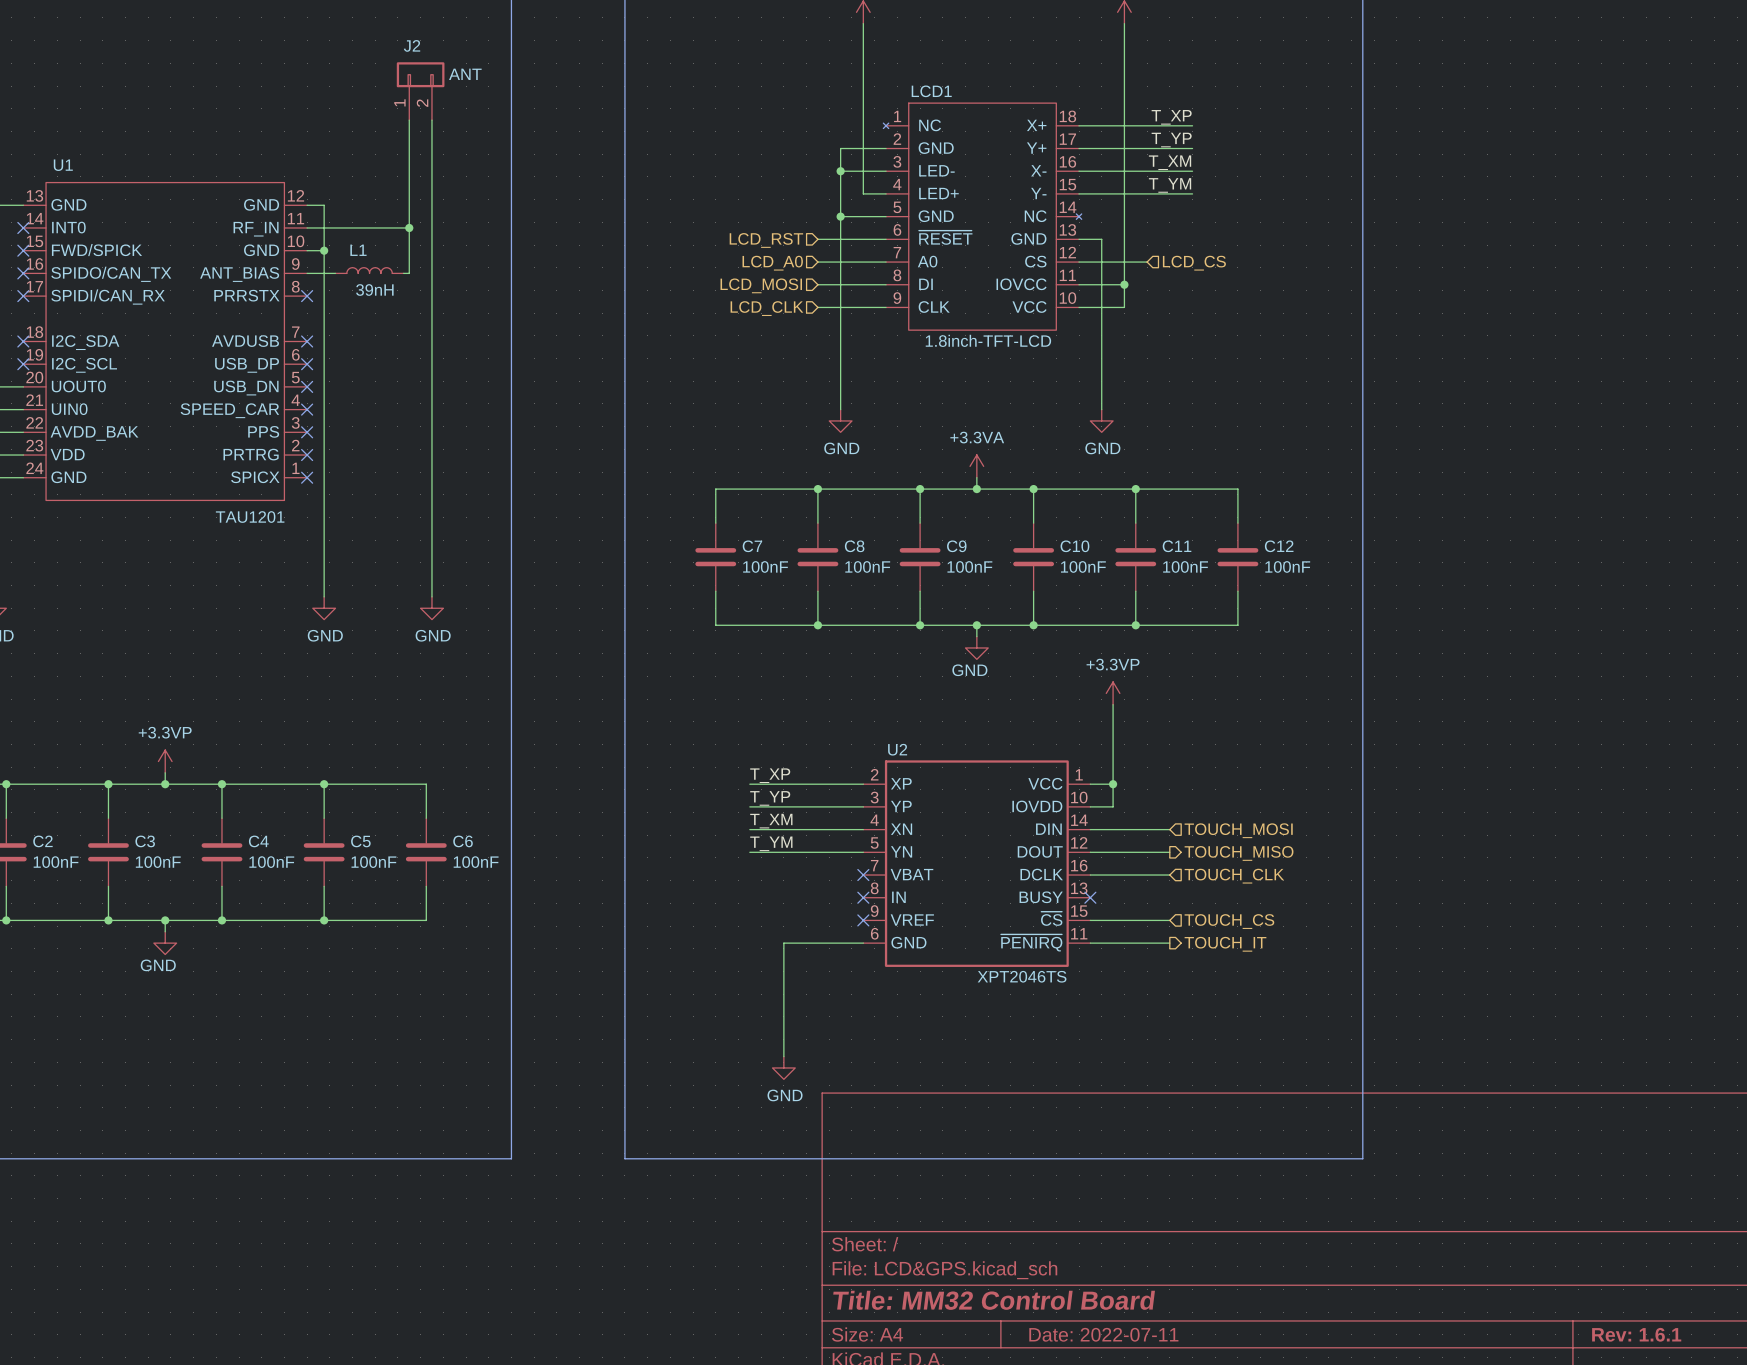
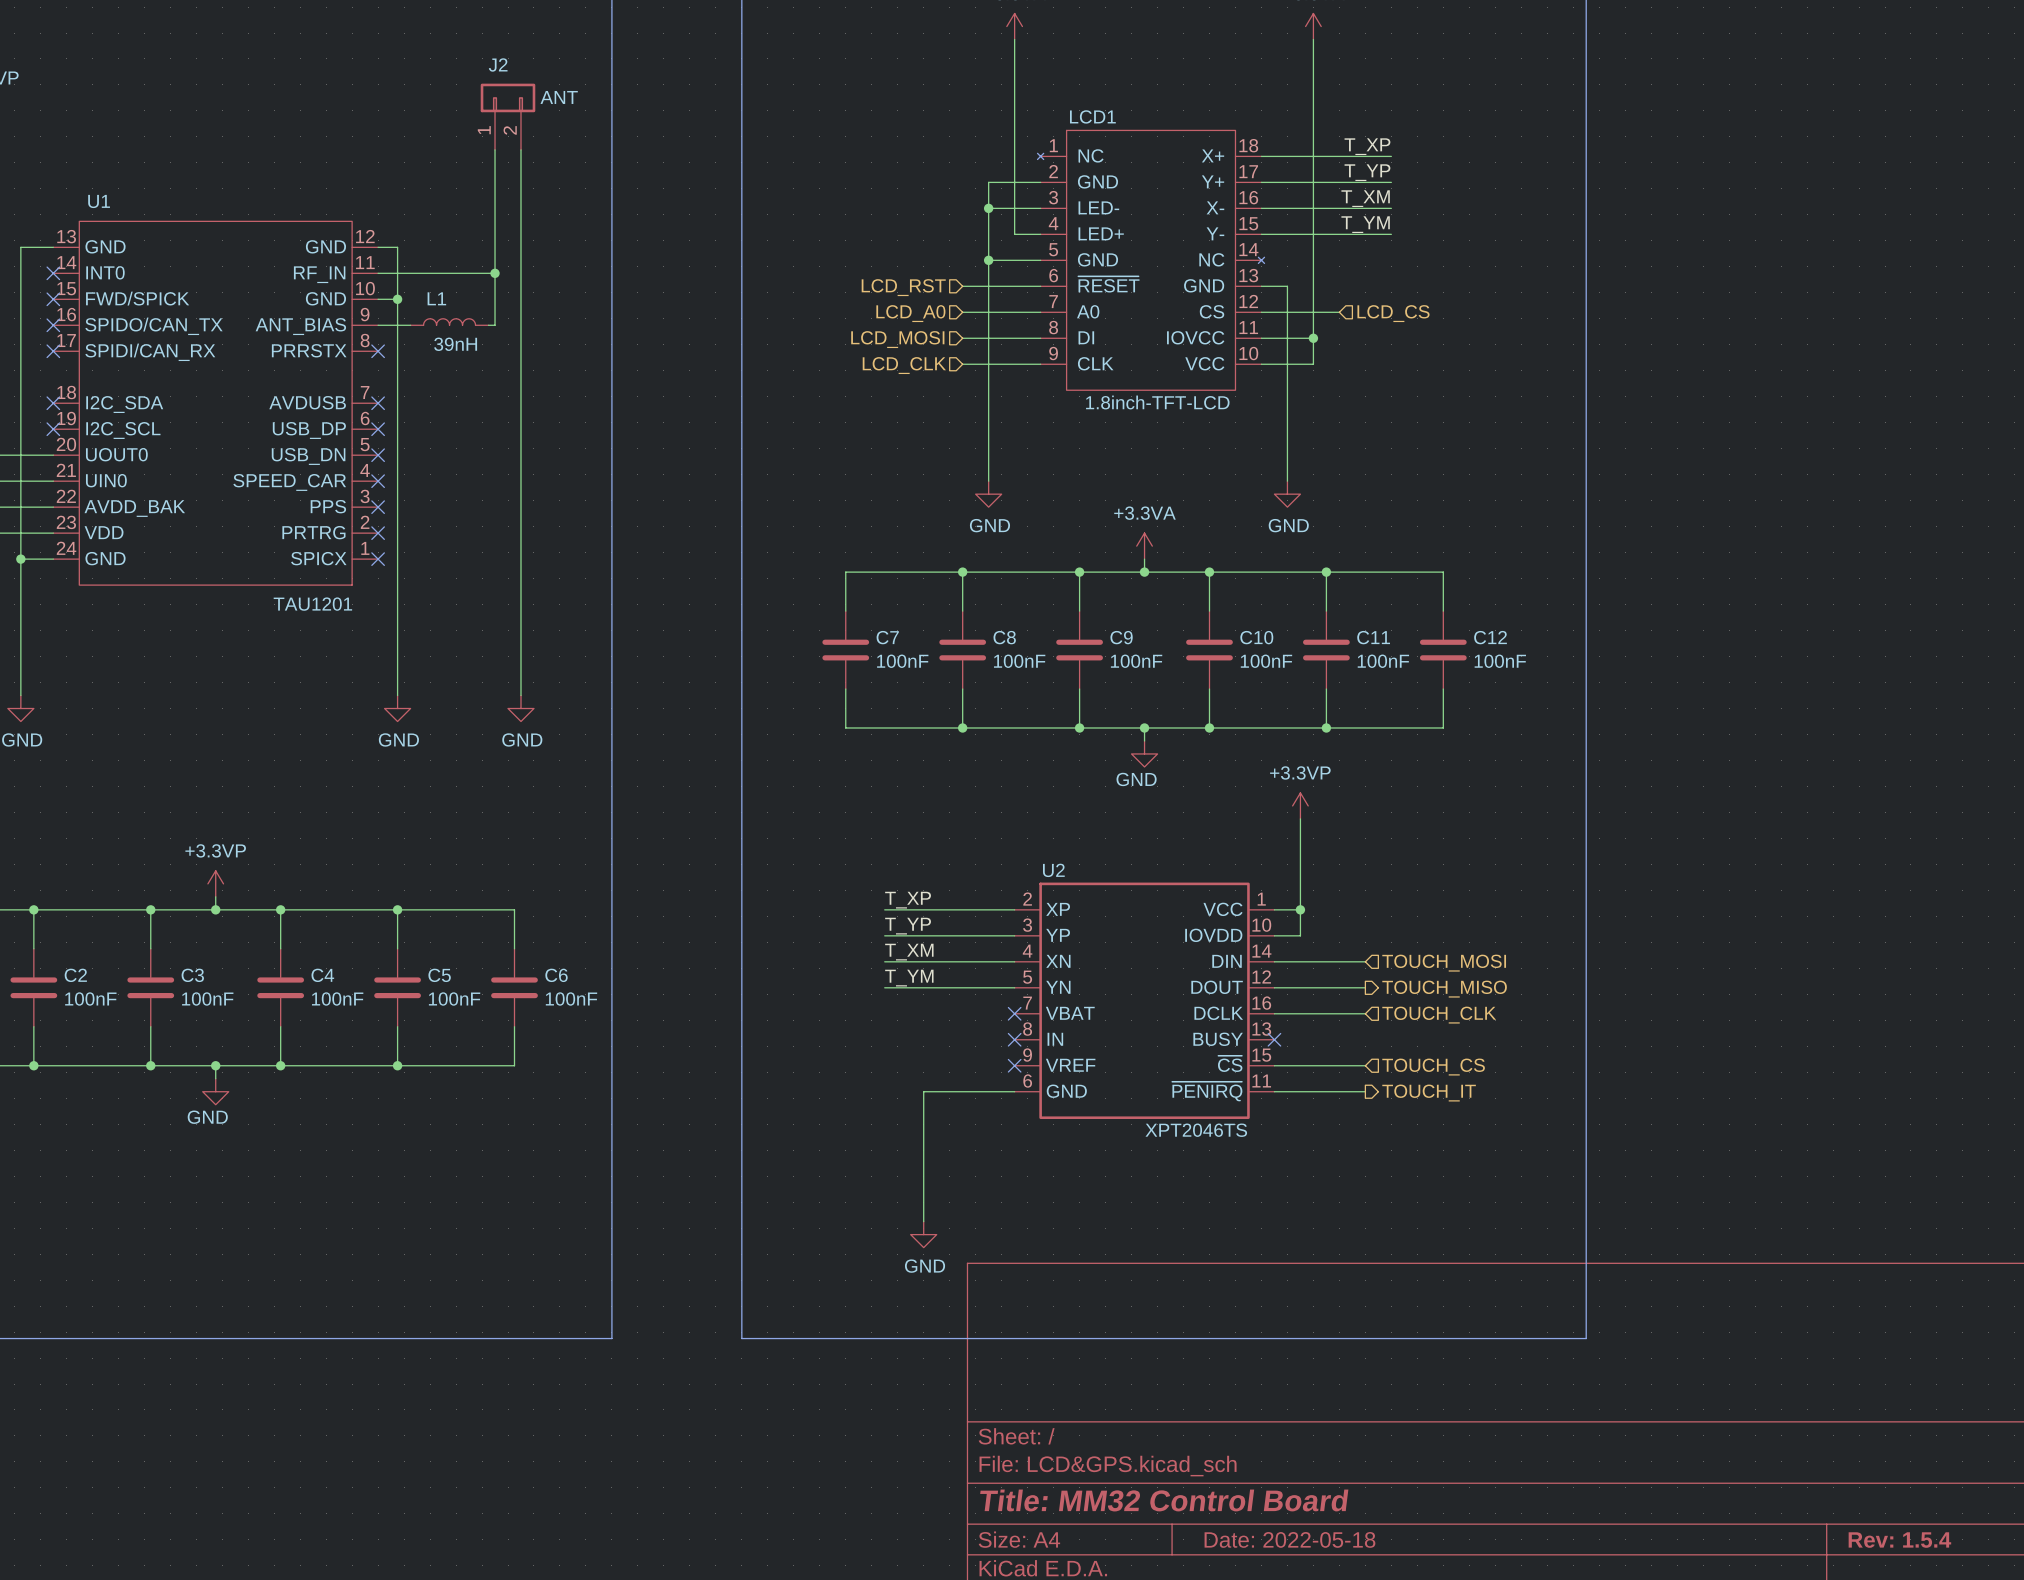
title block: Date: 2022-07-11 (1103, 1334) -> Date: 2022-05-18 (1289, 1539)
title block: Rev: 1.6.1 (1636, 1334) -> Rev: 1.5.4 (1899, 1540)

